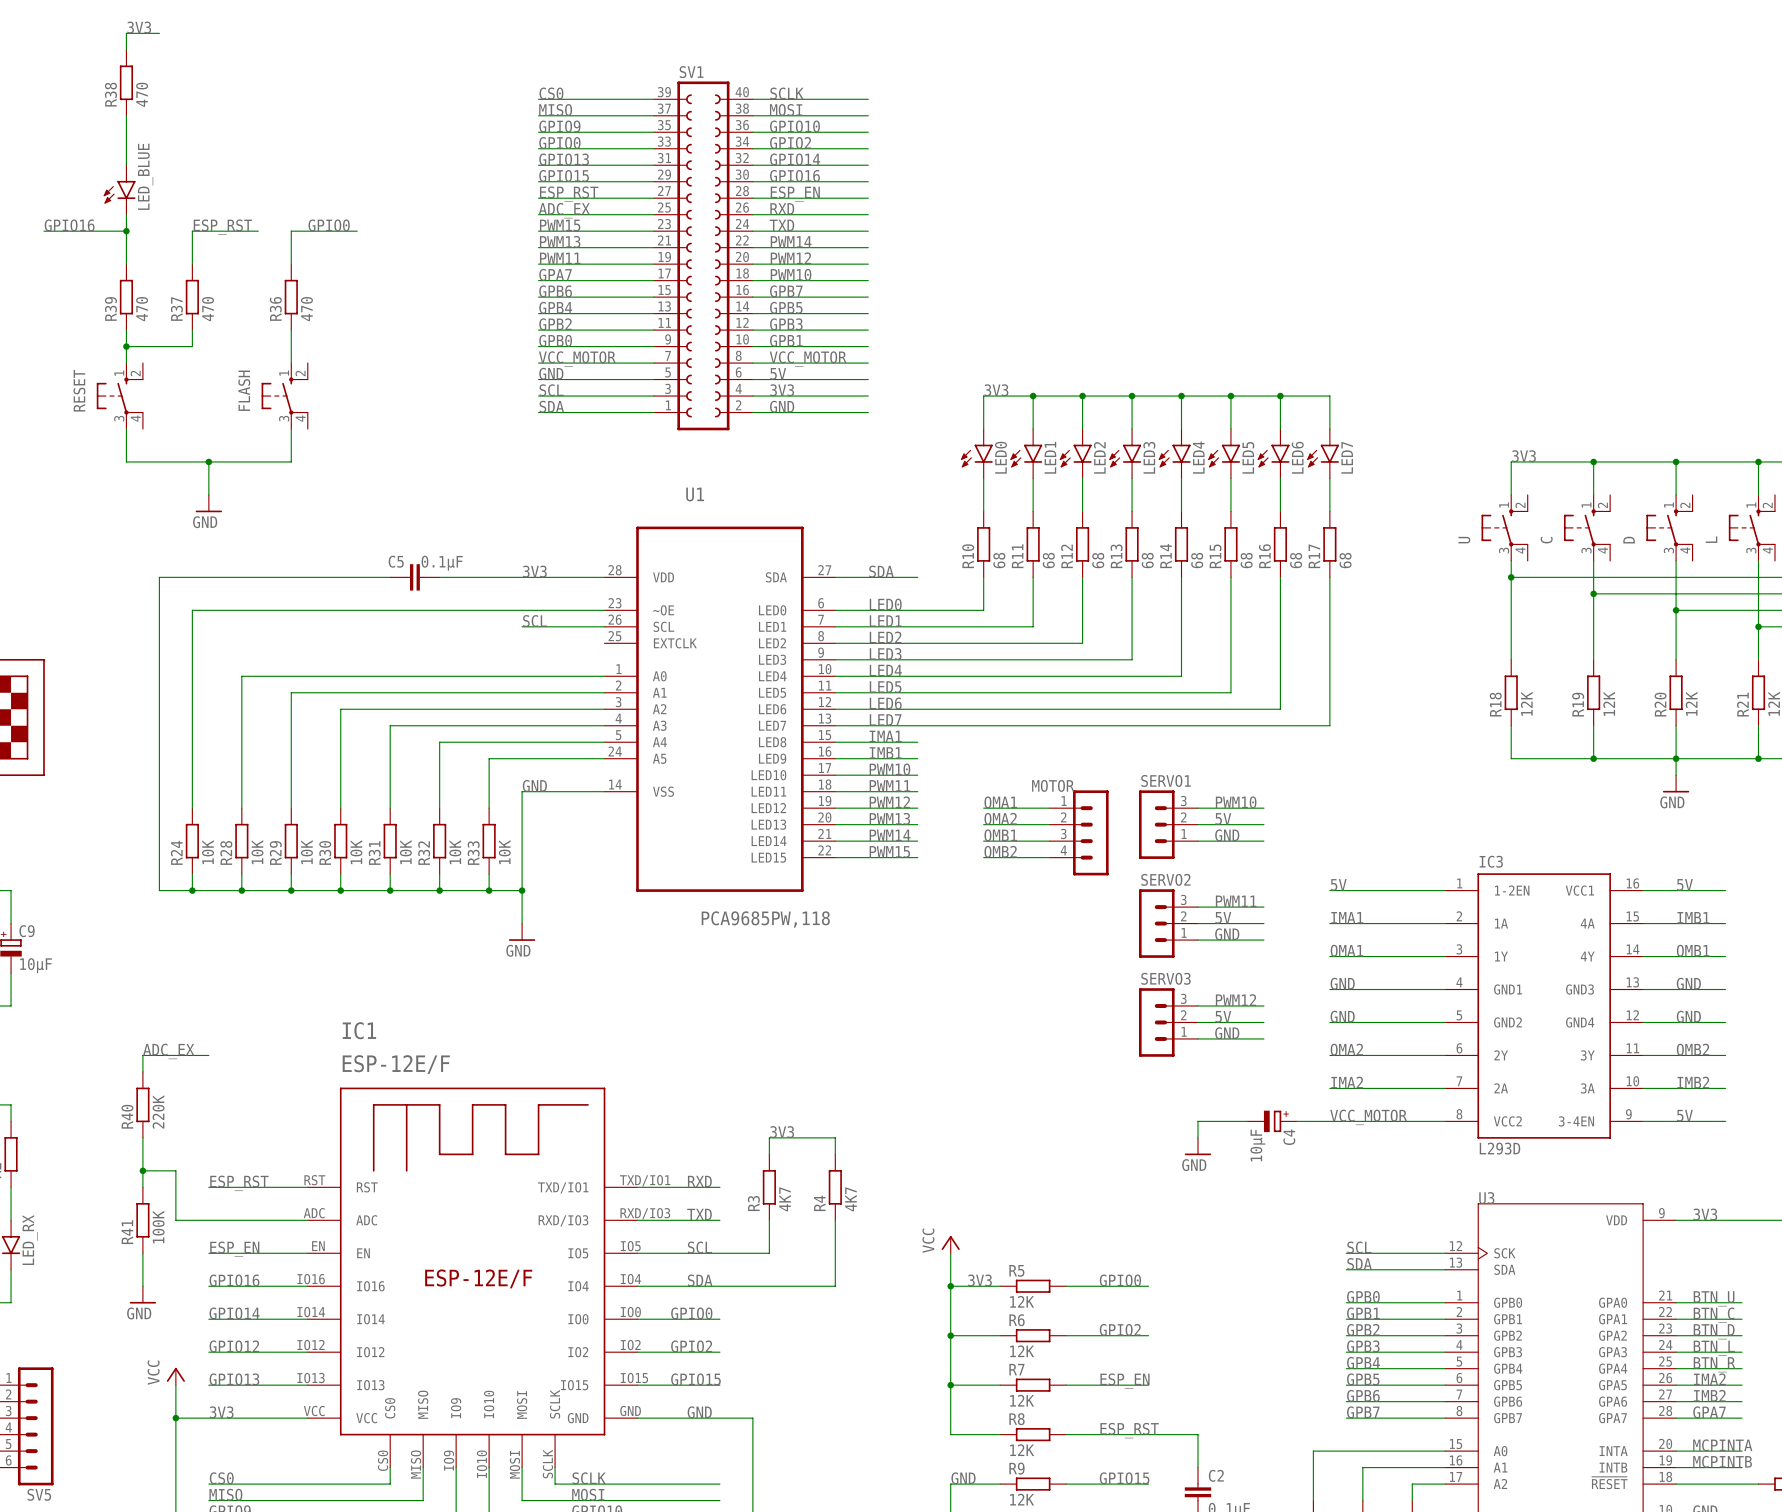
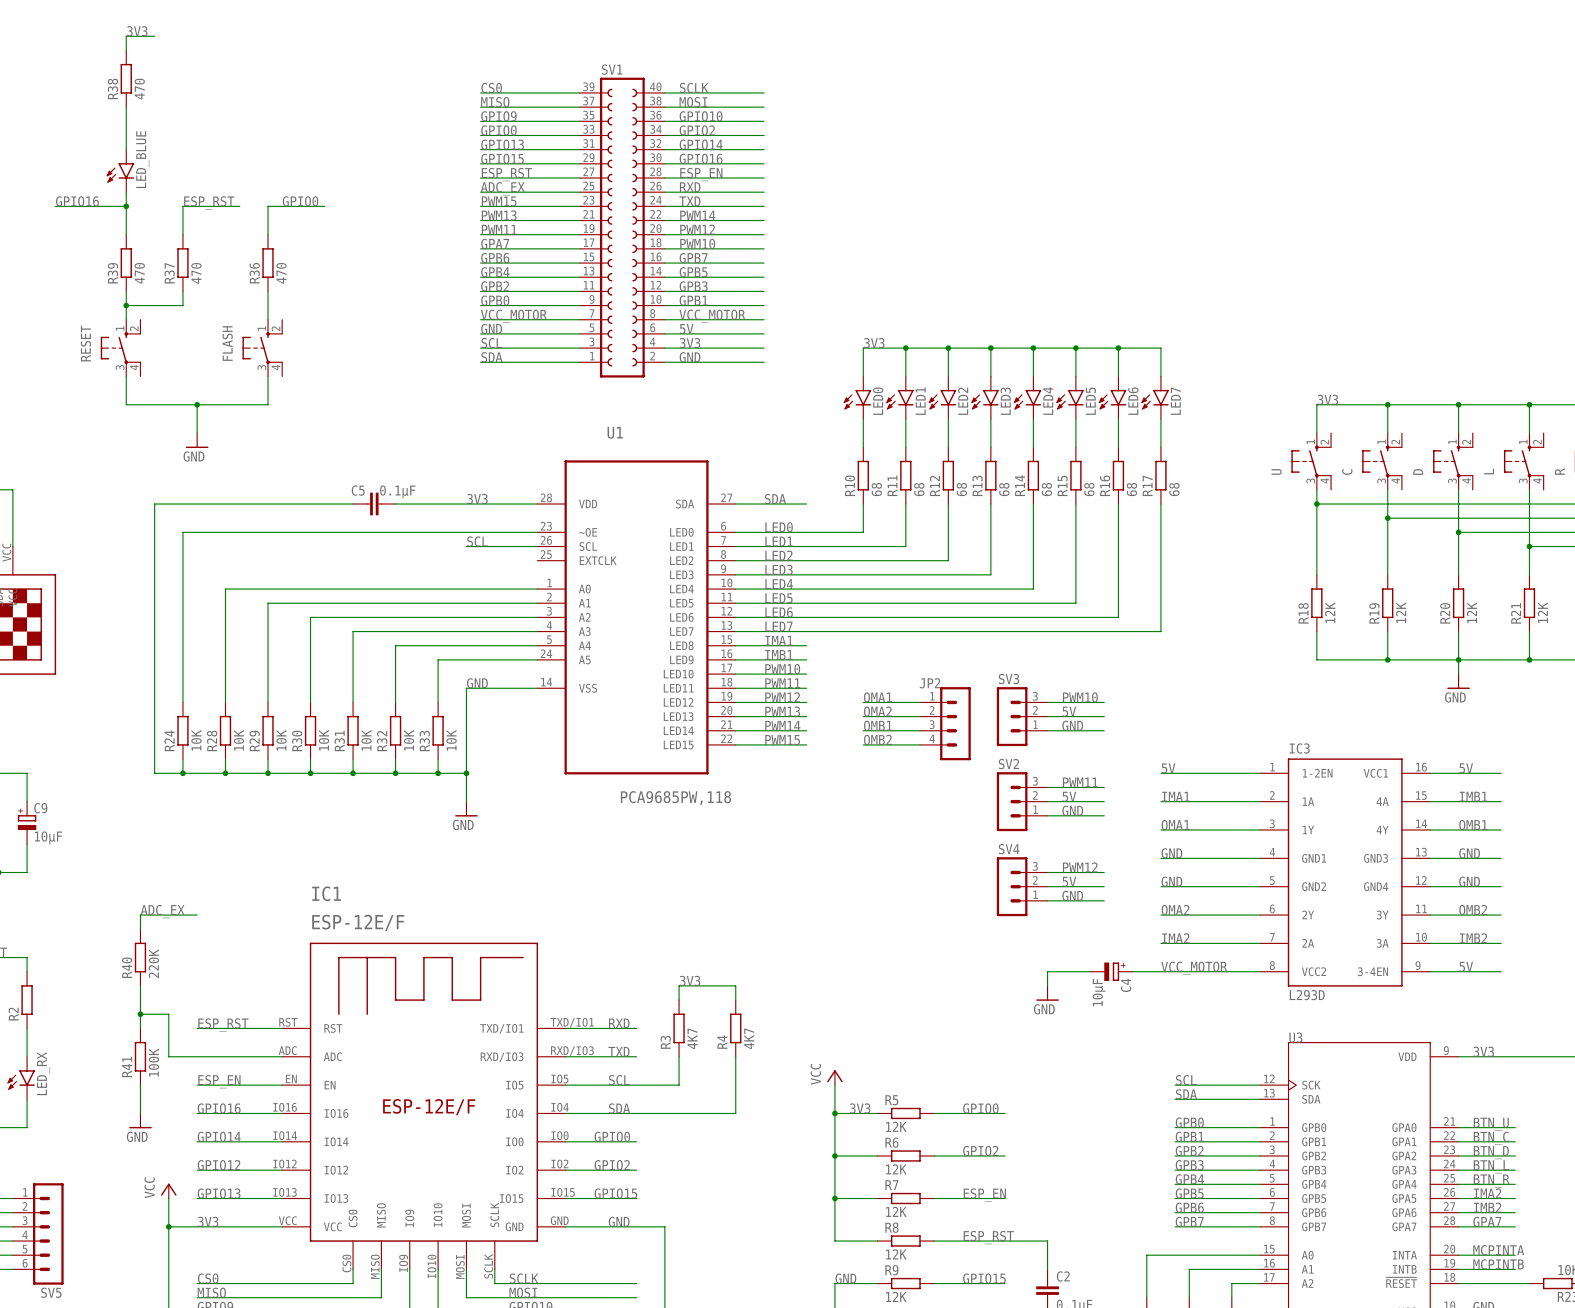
SERVO1 name: SERVO1 (1166, 780) -> SV3 (1008, 679)
MOTOR name: MOTOR (1053, 785) -> JP2 (930, 683)
SERVO2 name: SERVO2 (1165, 879) -> SV2 (1008, 764)
SERVO3 name: SERVO3 (1165, 978) -> SV4 (1009, 849)

